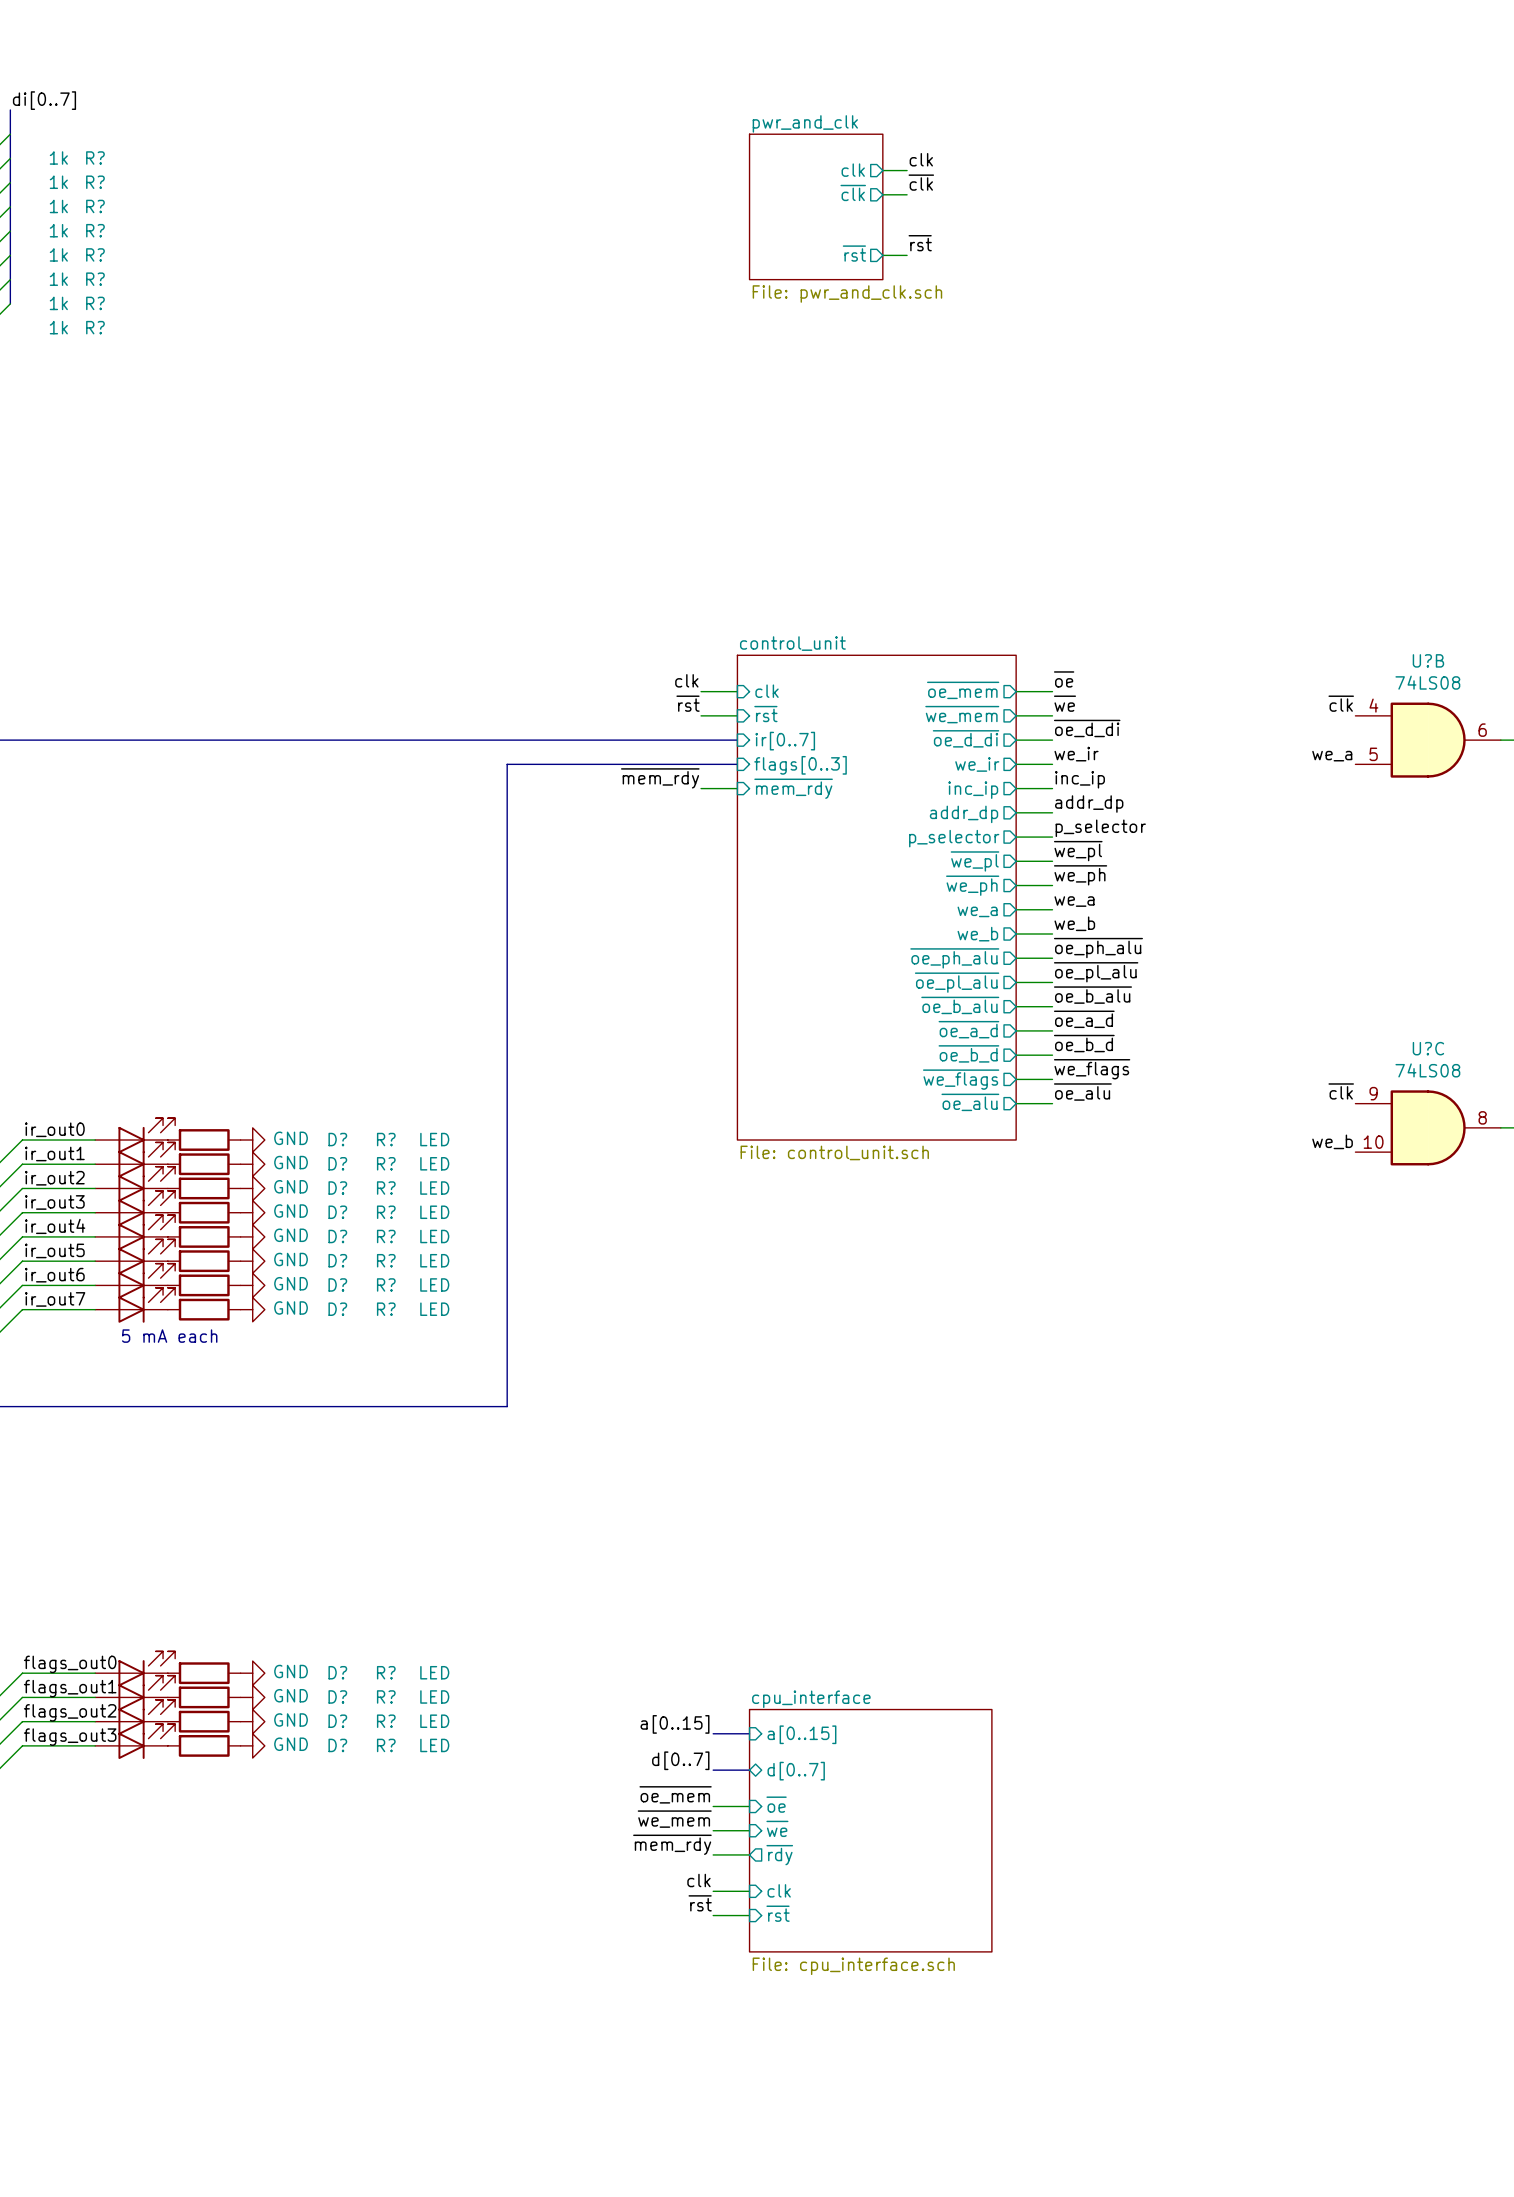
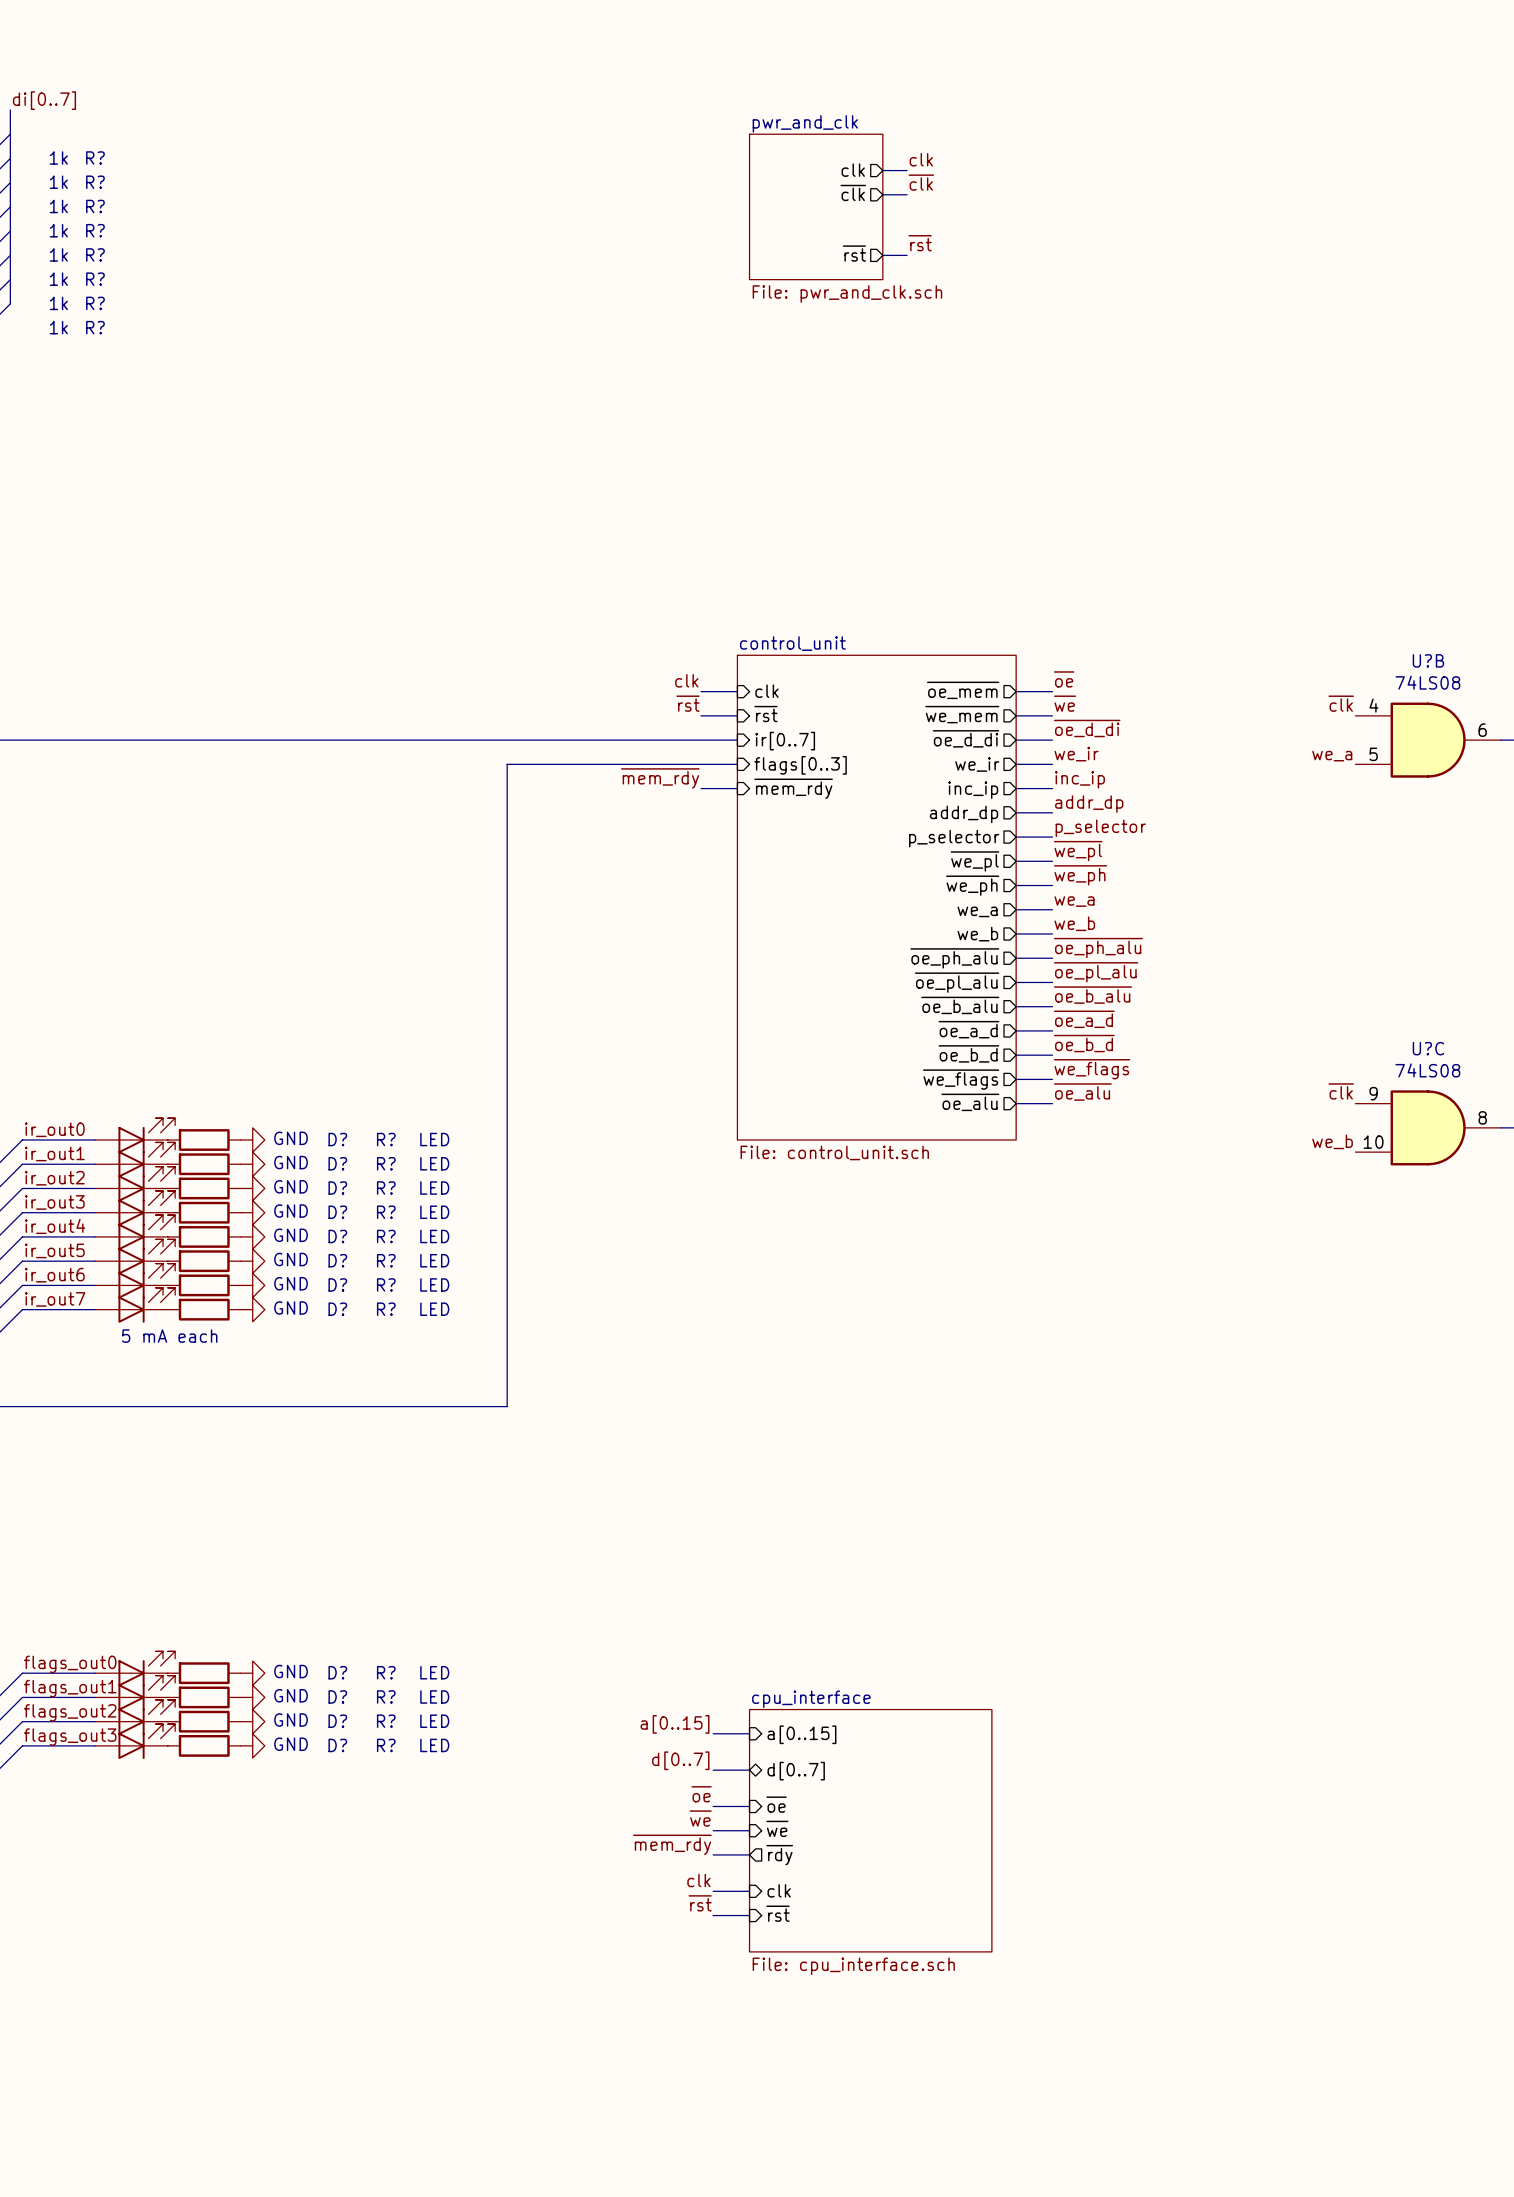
label: ~{oe_mem} (675, 1794) -> ~{oe} (701, 1794)
label: ~{we_mem} (674, 1819) -> ~{we} (700, 1818)

